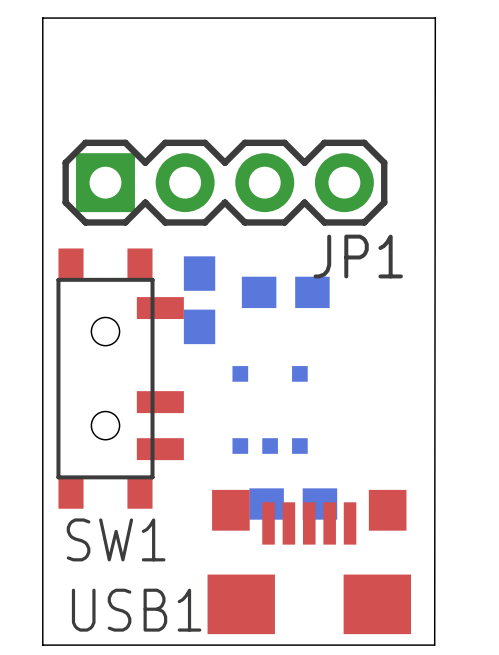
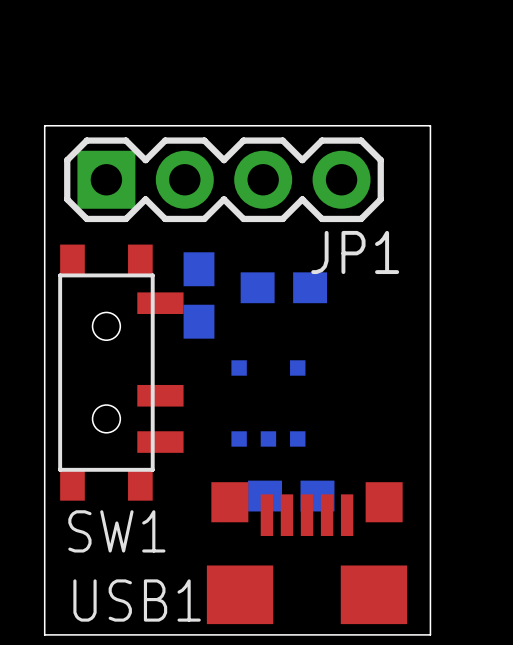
board edge: (42, 127) (42, 18) (435, 18) (434, 645) -> (44, 125) (430, 125) (430, 634)

